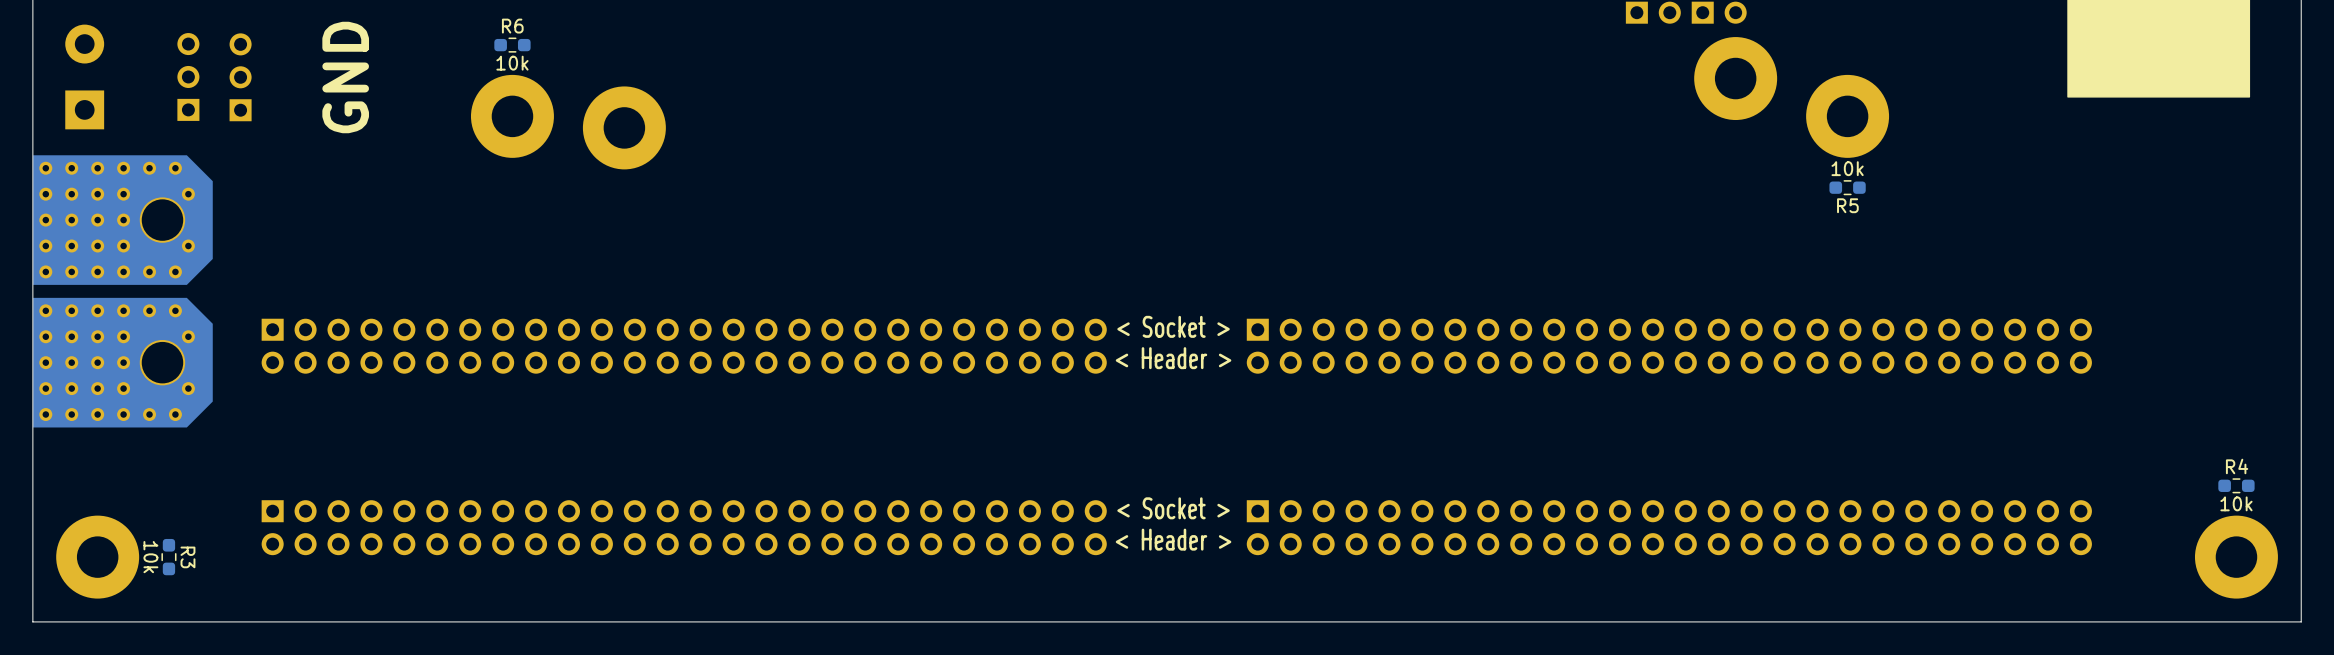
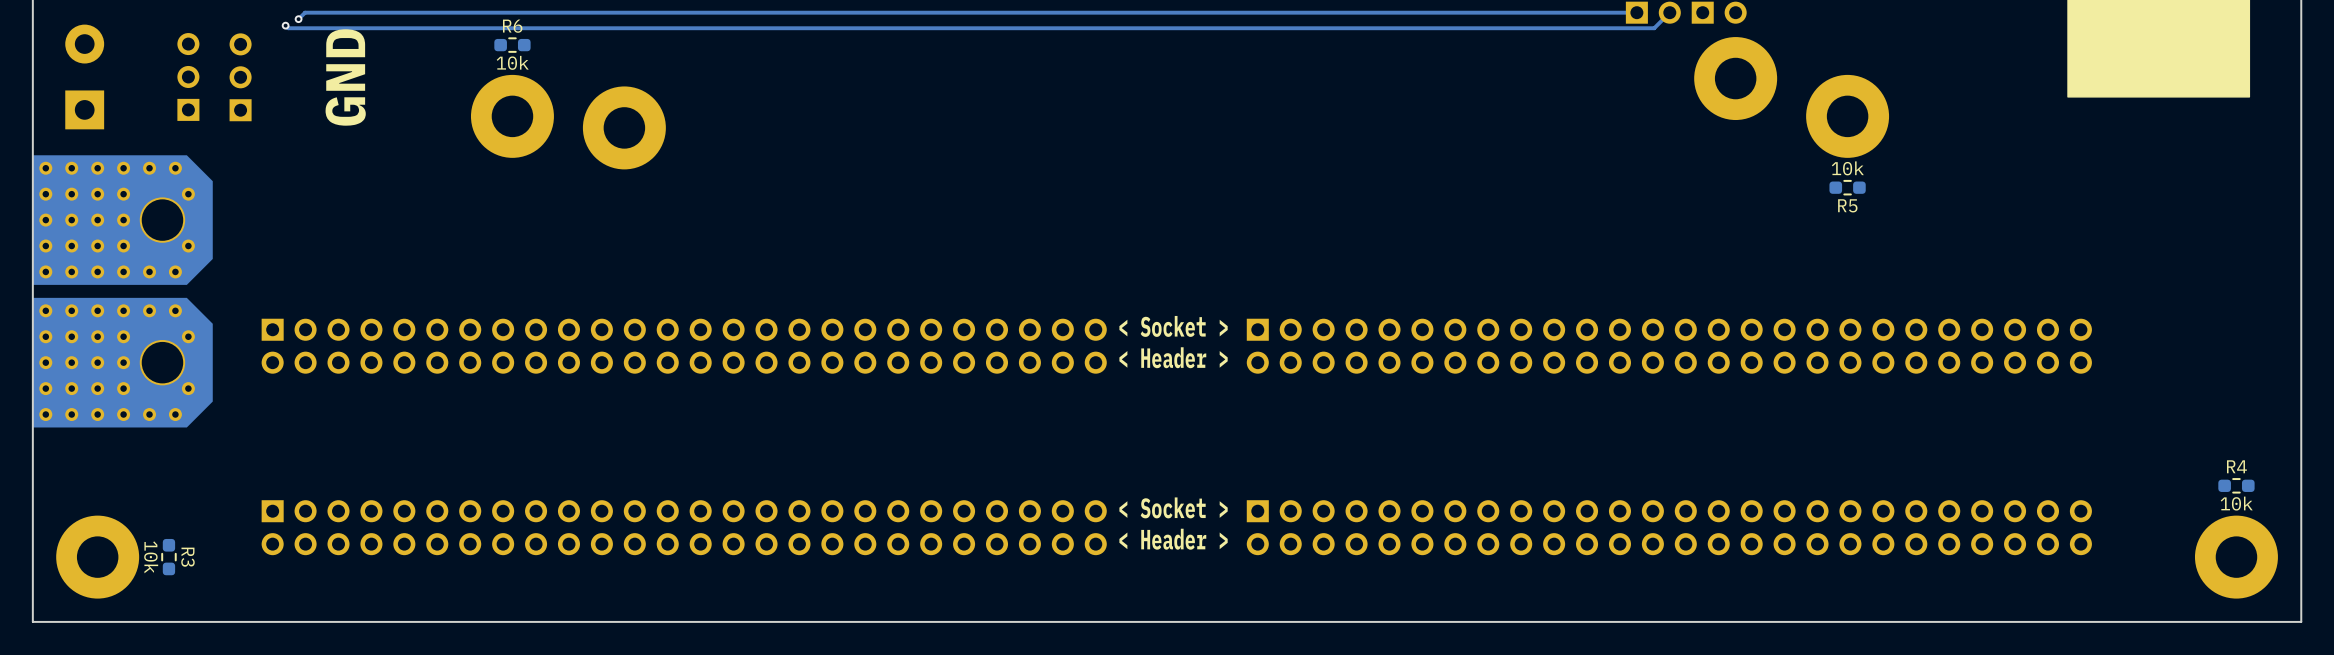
track: none -> (1636, 12) (305, 12) (298, 19)
track: none -> (1669, 12) (1654, 28) (288, 28) (285, 25)
via: none -> (298, 19)
via: none -> (285, 25)

